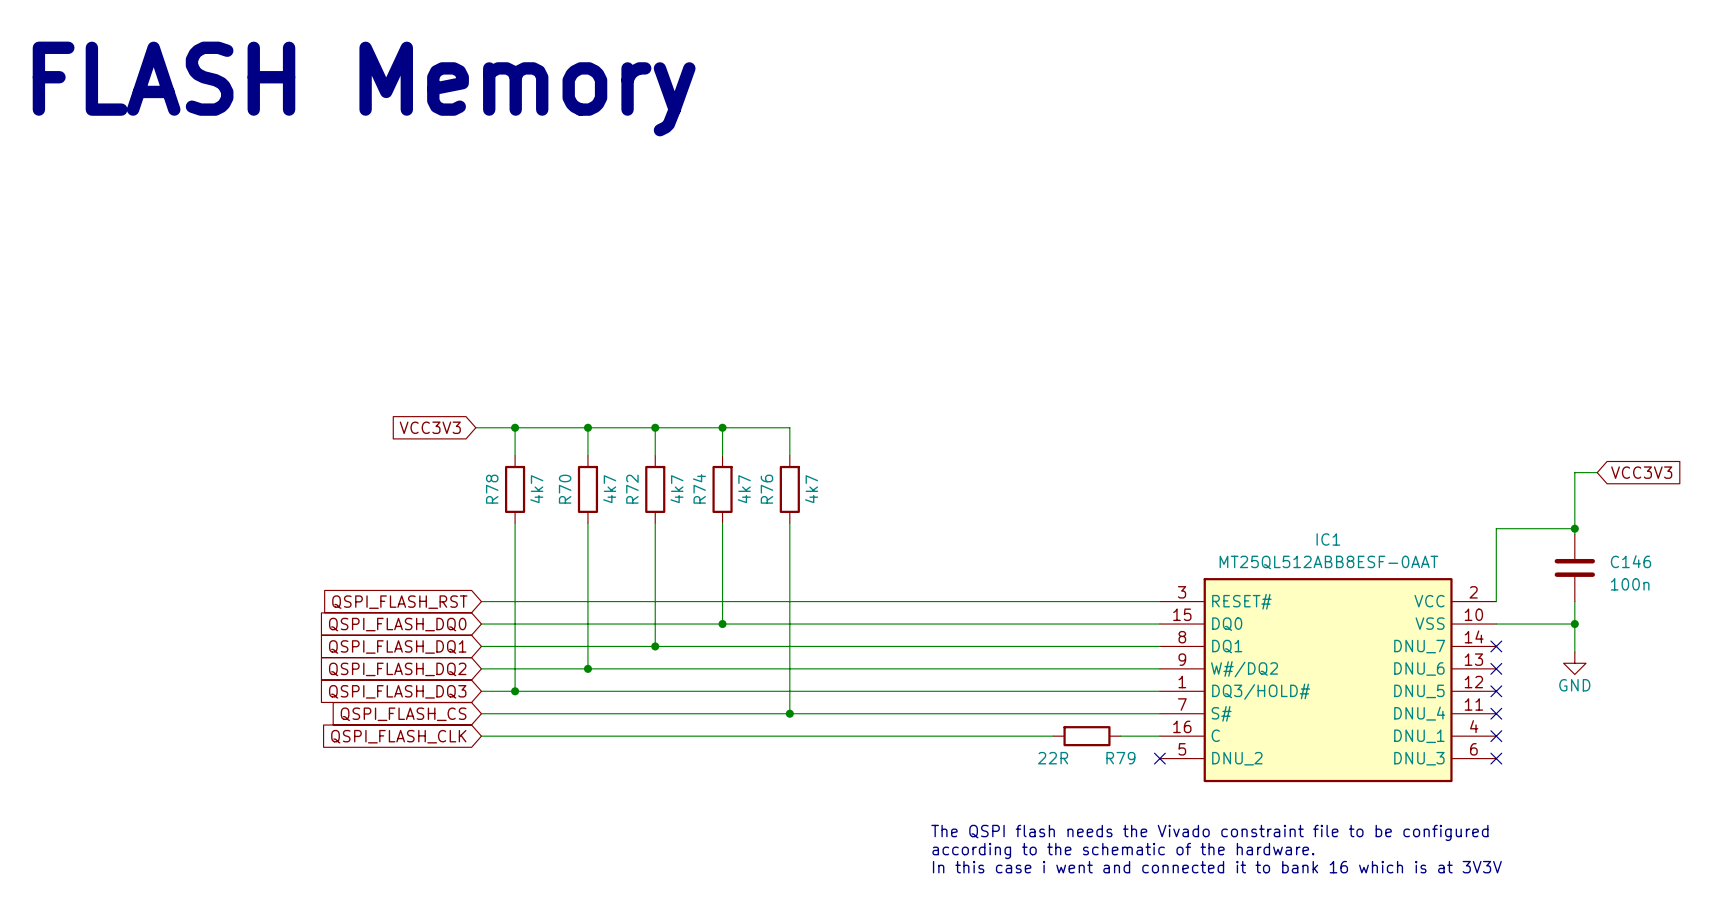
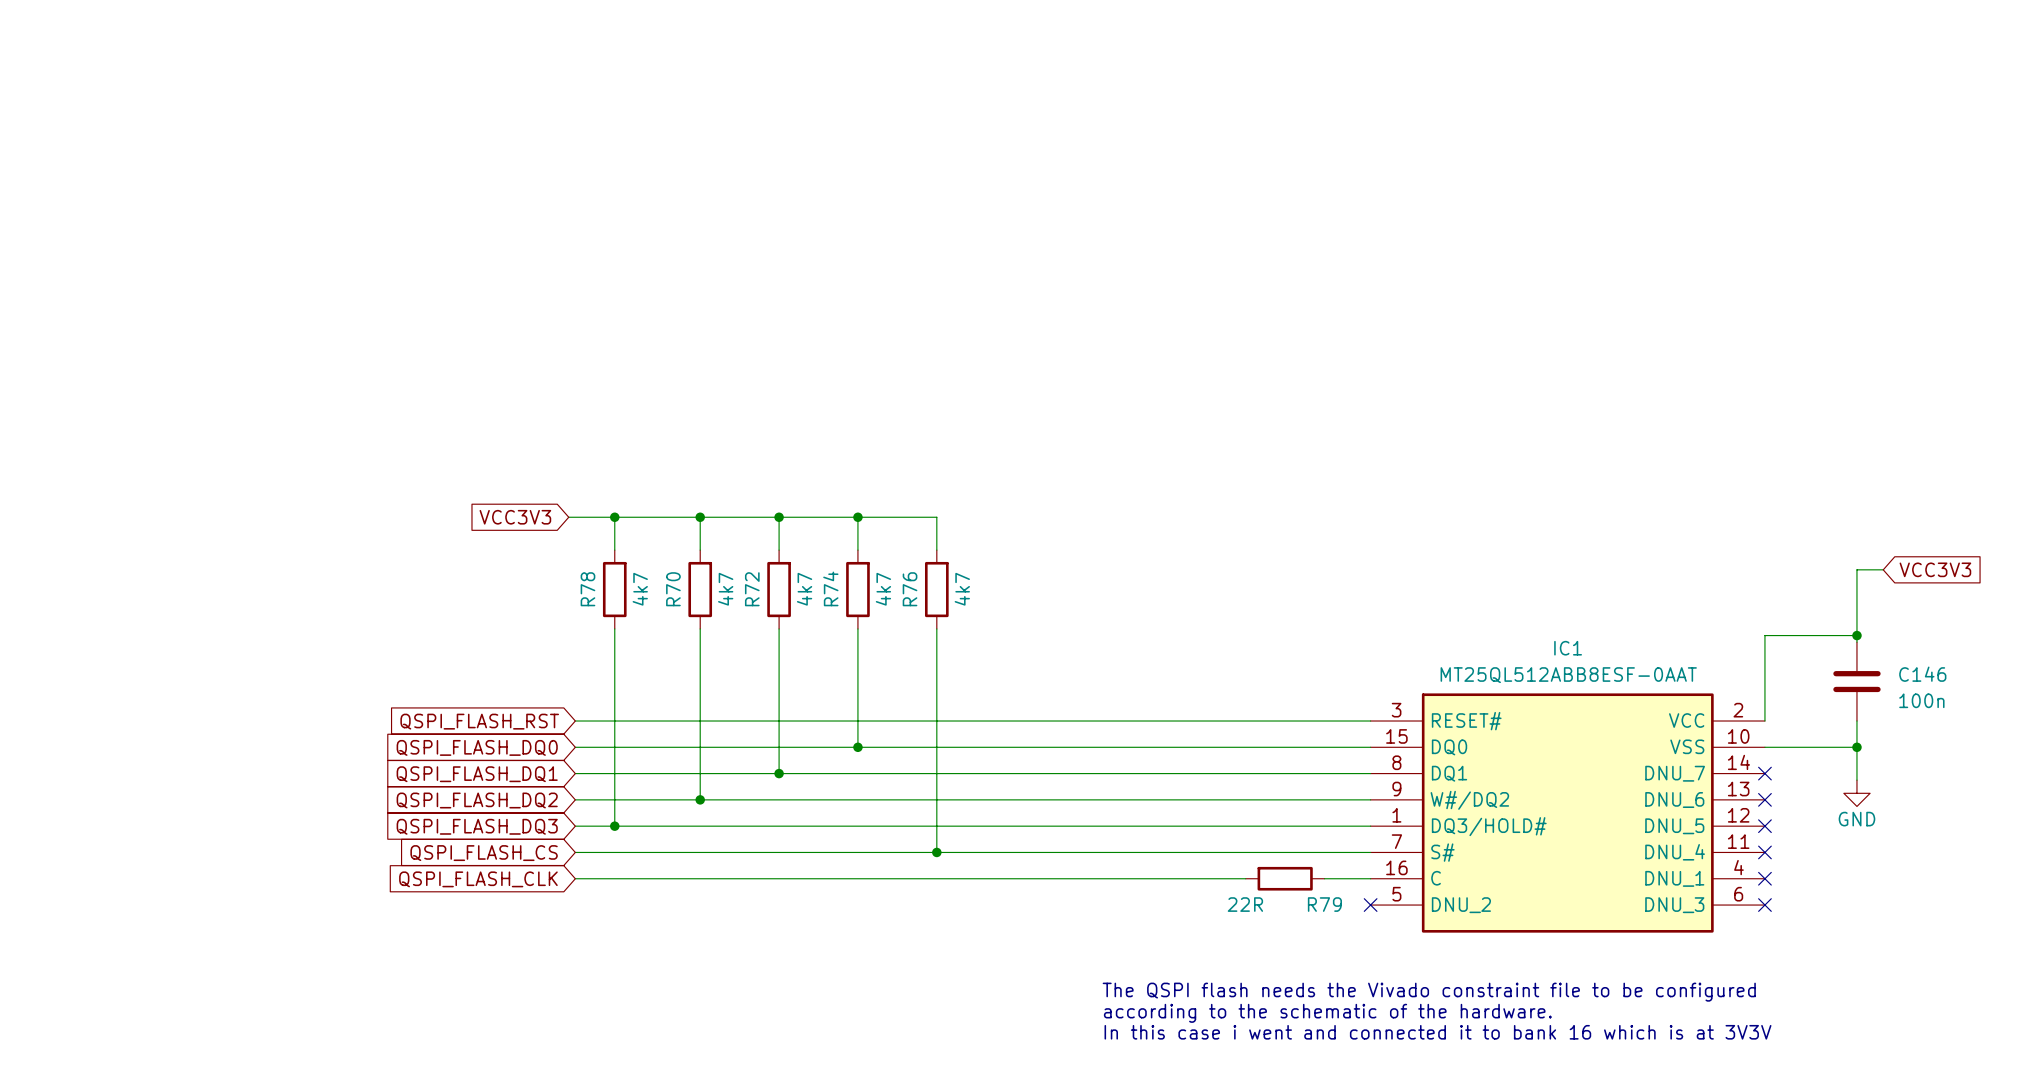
text: FLASH Memory (364, 89) -> none

